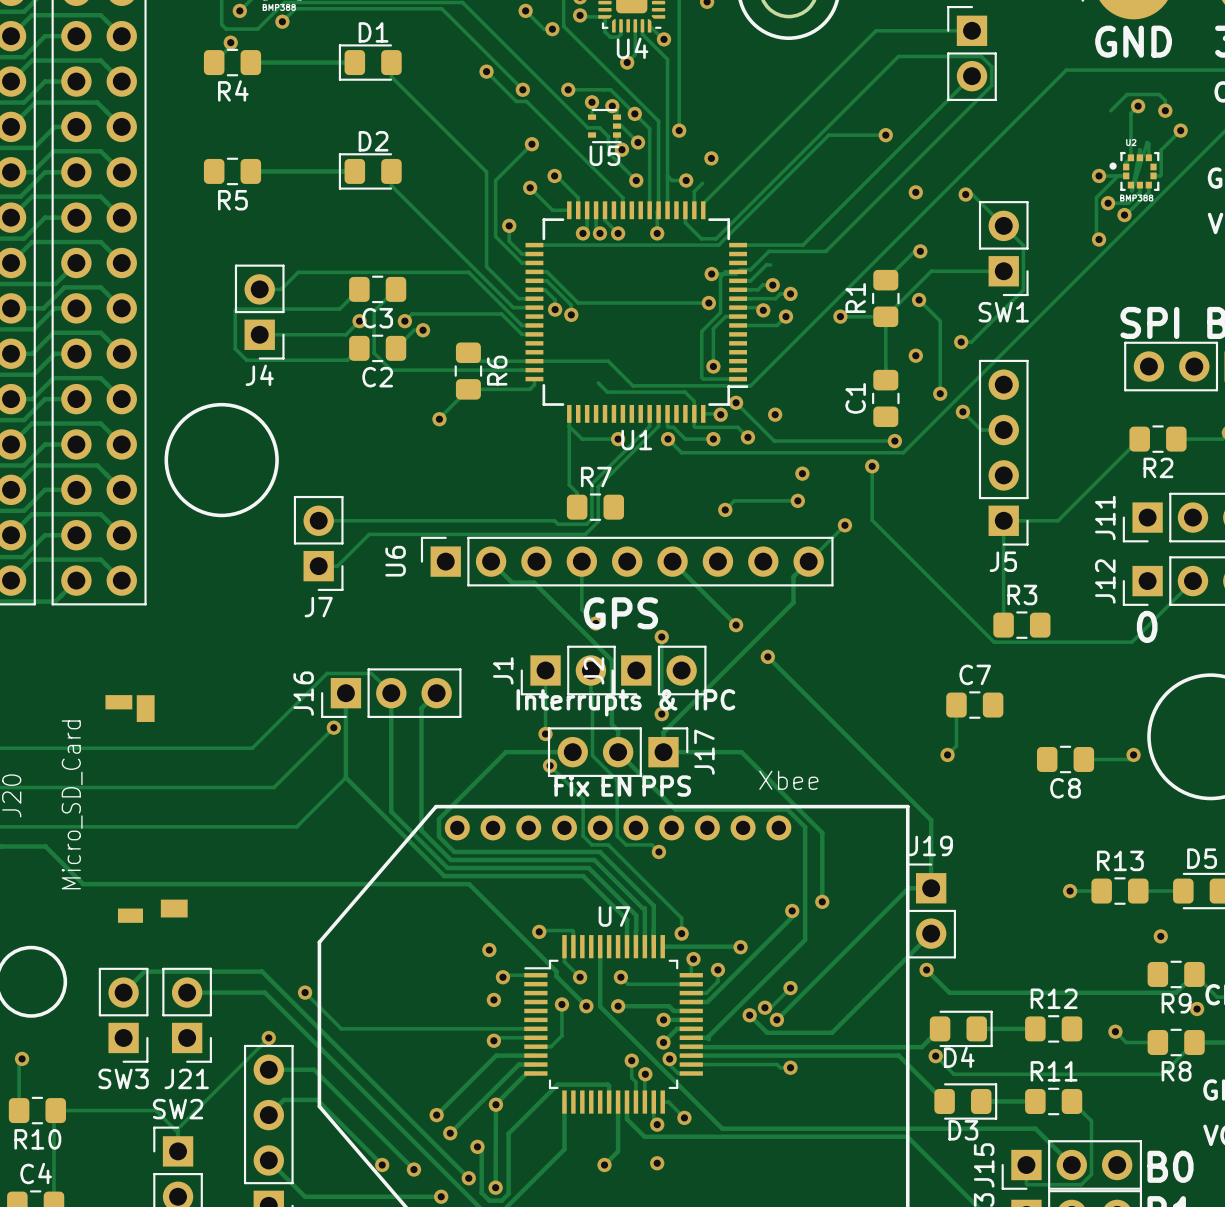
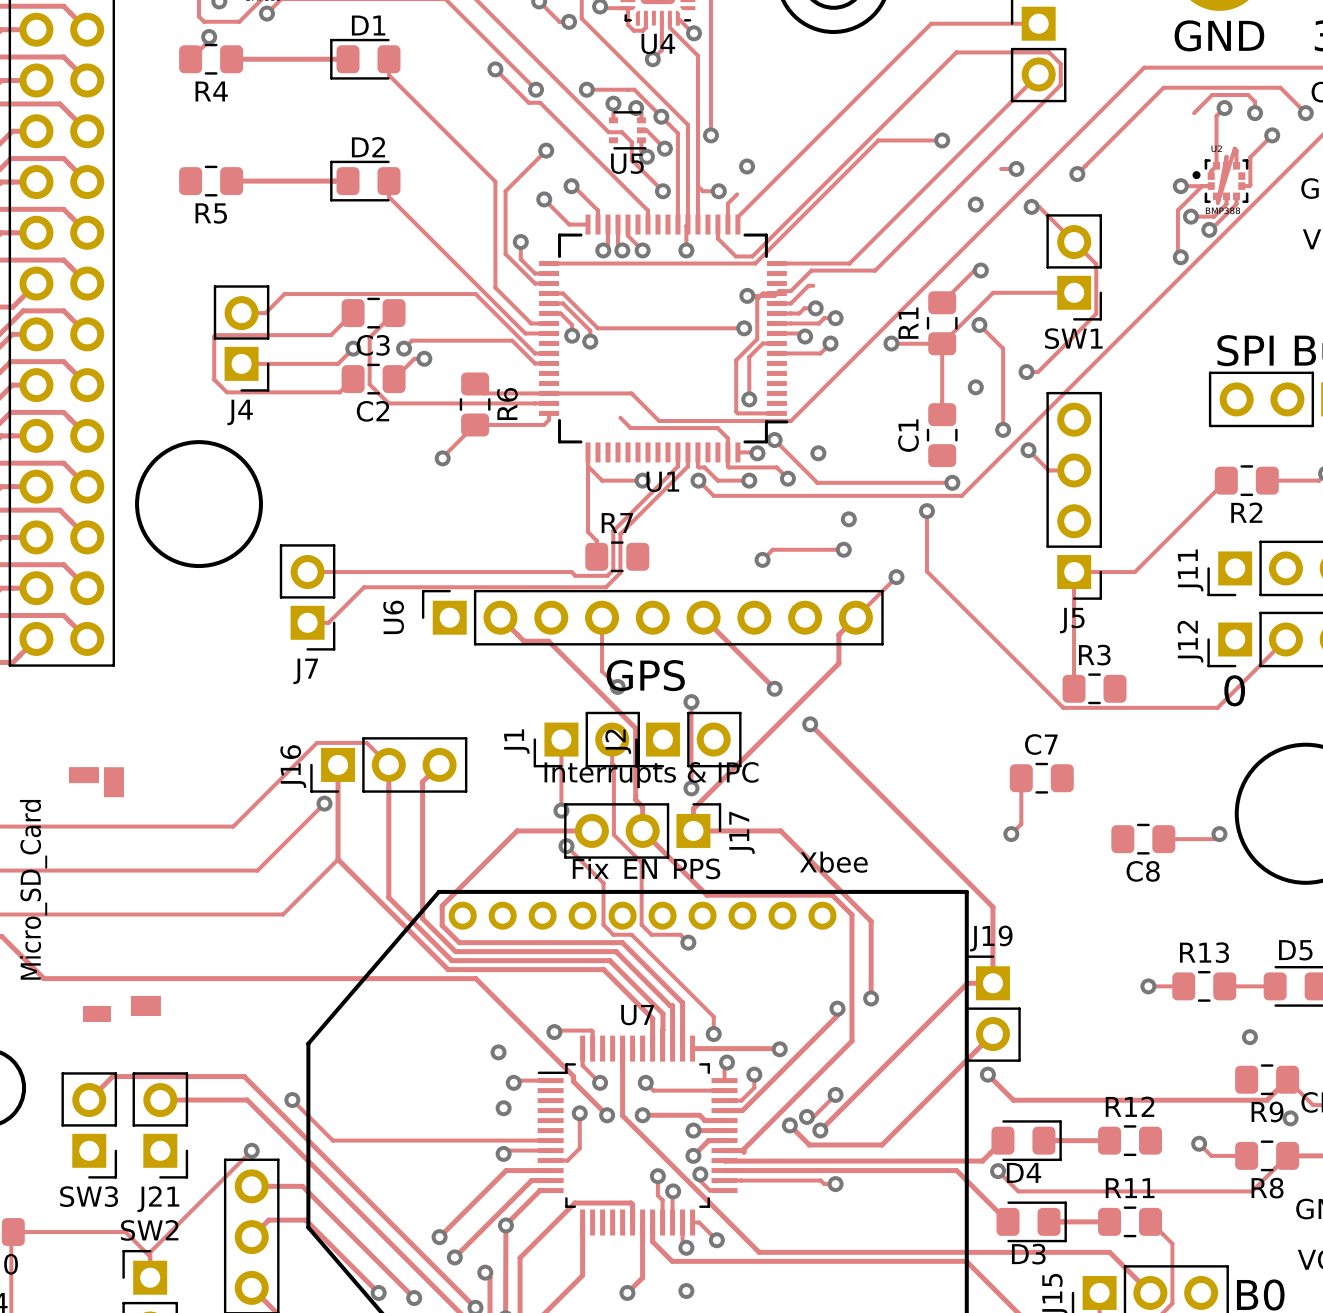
track: none -> (1305, 113) (1280, 87) (1163, 87) (1077, 174)
via: none -> (1305, 113)
track: none -> (1001, 168) (1016, 168)
via: none -> (1016, 168)
via: none -> (1077, 174)

